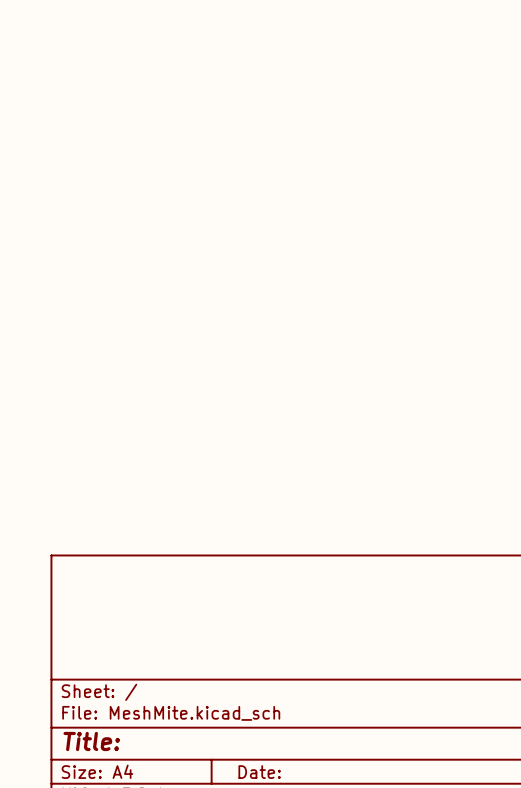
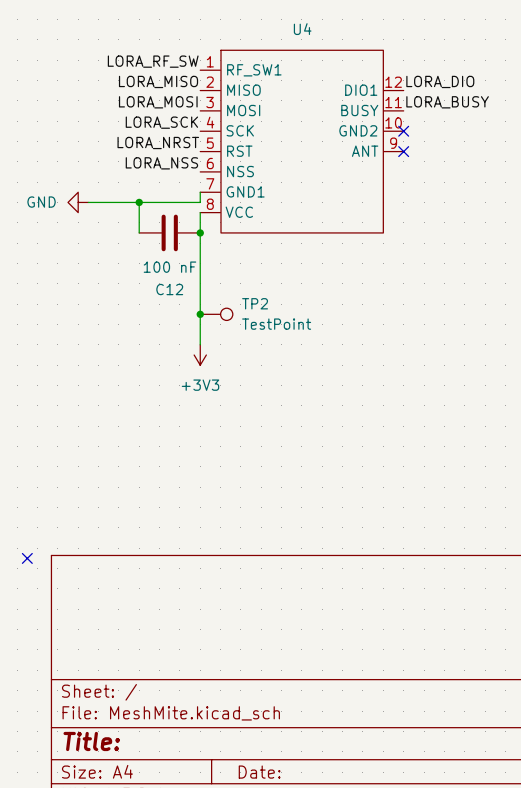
label: none -> LORA_RF_SW (153, 61)
label: none -> LORA_MISO (158, 81)
label: none -> LORA_DIO (440, 81)
label: none -> LORA_MOSI (158, 102)
label: none -> LORA_BUSY (447, 102)
label: none -> LORA_SCK (161, 122)
no-connect mark: none -> (403, 131)
U4: none -> (301, 141)
label: none -> LORA_NRST (158, 142)
no-connect mark: none -> (403, 151)
label: none -> LORA_NSS (161, 163)
wire: none -> (200, 192) (200, 202) (88, 202)
power symbol: none -> GND (78, 202)
wire: none -> (139, 202) (139, 232)
junction: none -> (139, 202)
wire: none -> (200, 212) (200, 344)
C12: none -> 100 nF (169, 232)
junction: none -> (200, 232)
junction: none -> (200, 314)
TP2: none -> TestPoint (216, 314)
power symbol: none -> +3V3 (200, 355)
no-connect mark: none -> (27, 558)

